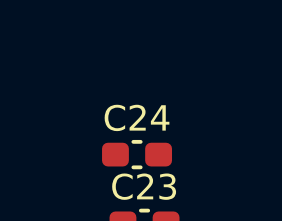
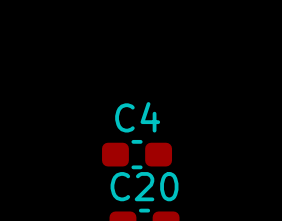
C24 name: C24 (137, 117) -> C4 (137, 117)
C23 name: C23 (144, 186) -> C20 (144, 186)

